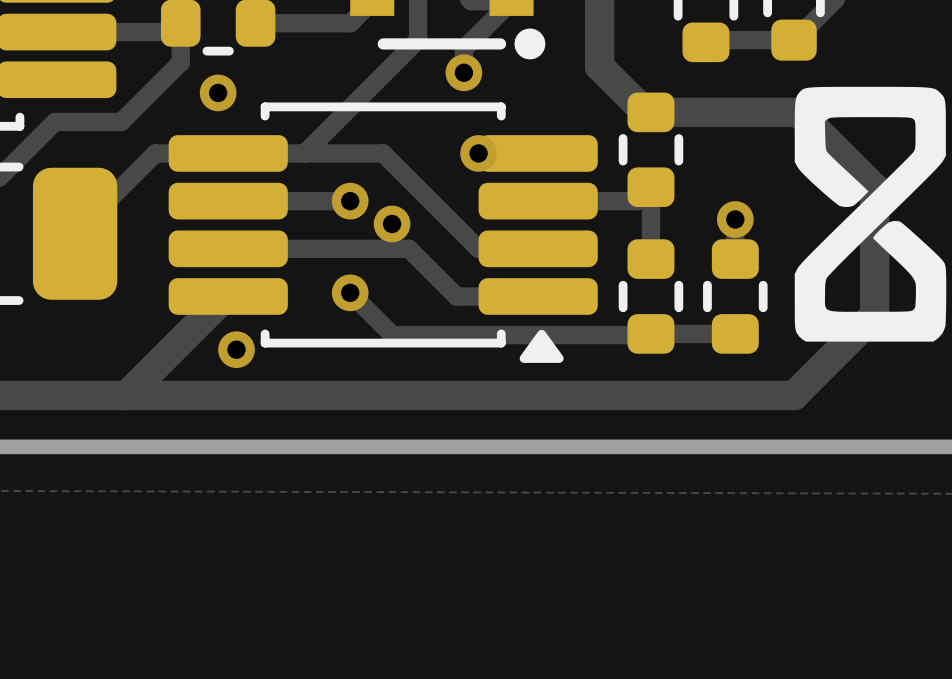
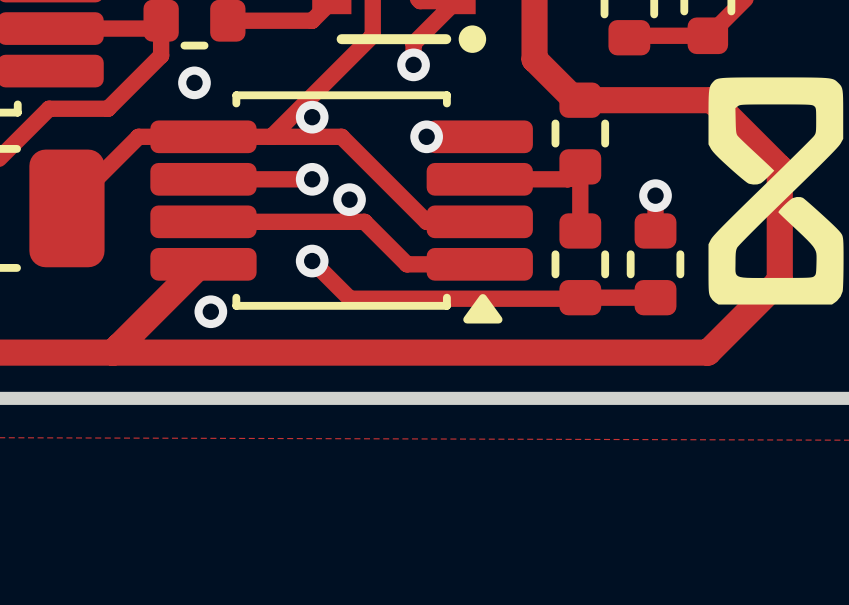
via: none -> (312, 117)

